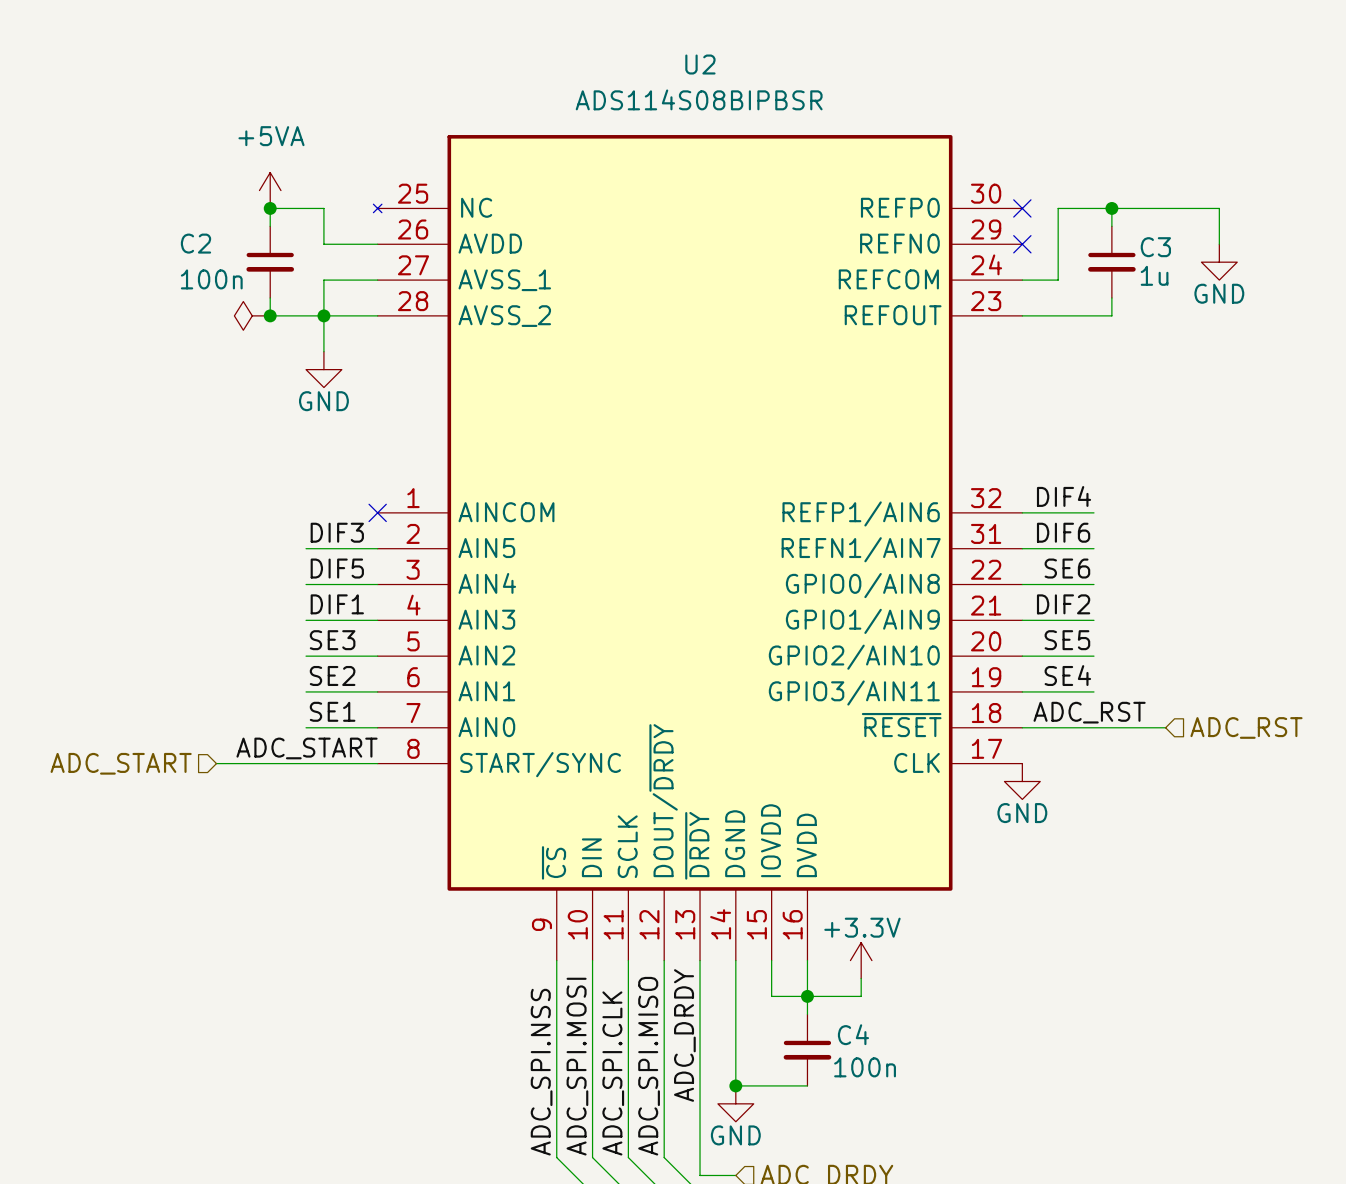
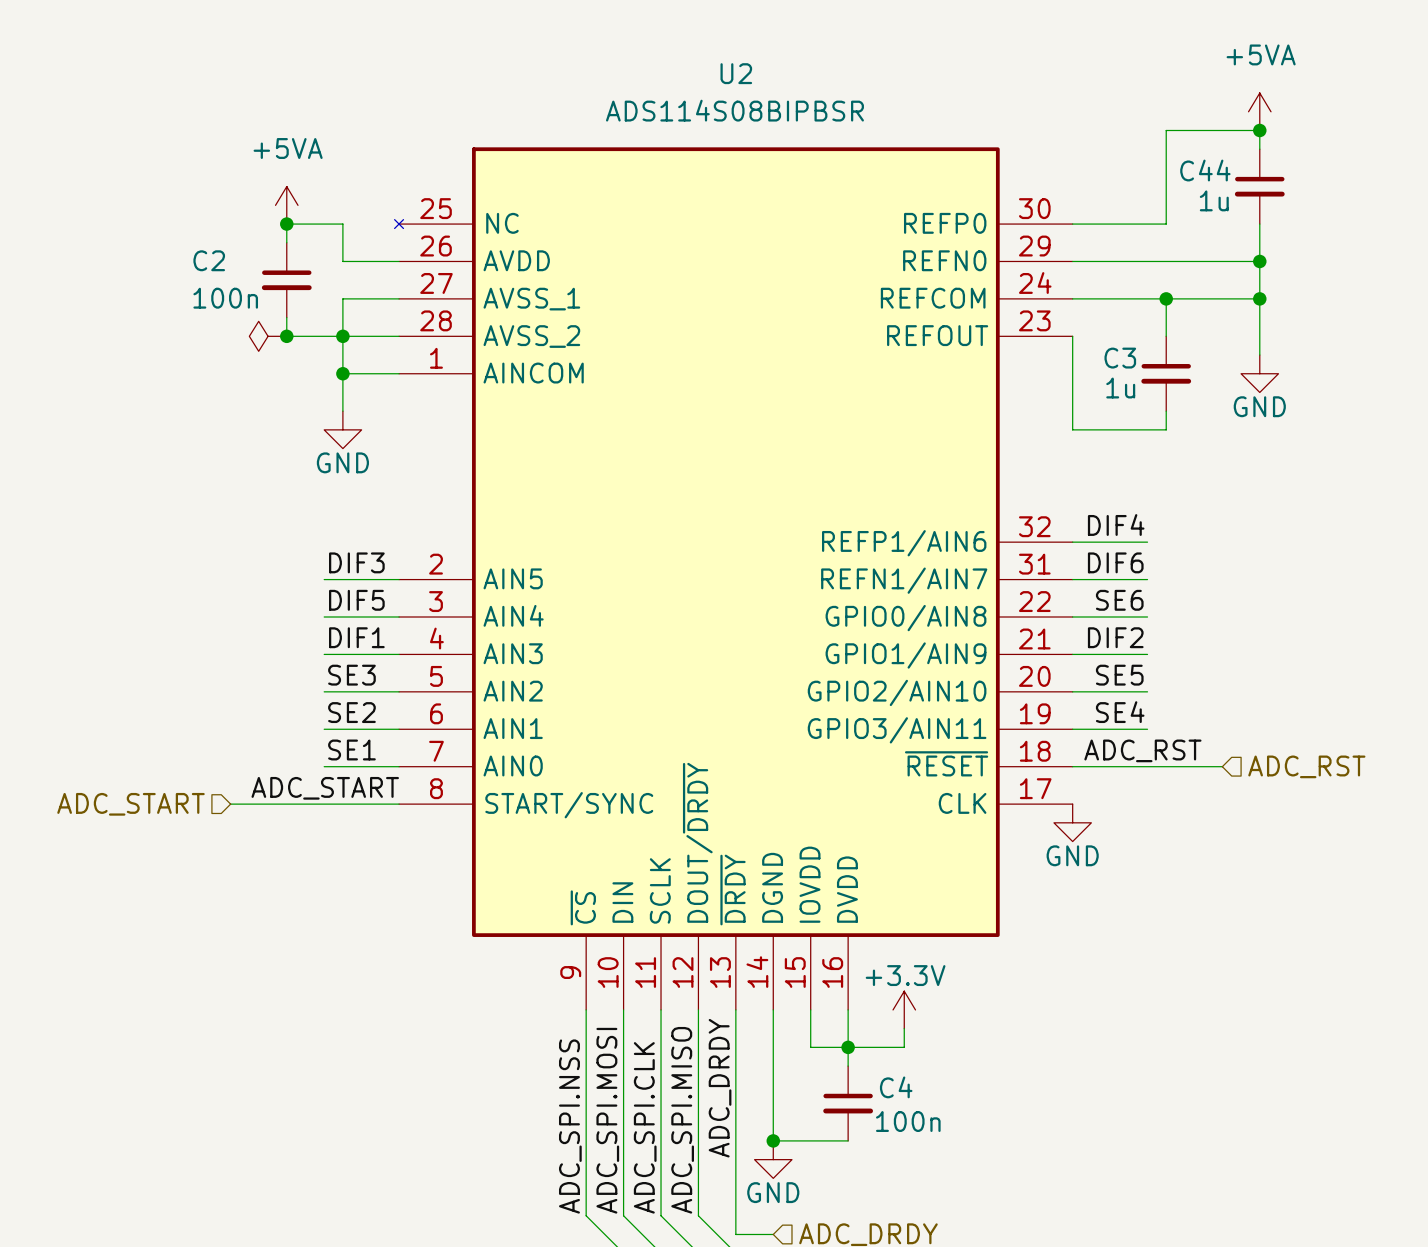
power symbol: none -> +5VA (1259, 111)
junction: none -> (1259, 130)
U2 symbol: [373, 135, 1023, 961] -> [394, 147, 1073, 1010]
wire: none -> (1259, 149) (1259, 130) (1166, 130) (1166, 224)
C44: none -> 1u (1259, 186)
no-connect mark: (1022, 208) -> none
wire: (1058, 208) (1058, 280) -> (1110, 224) (1072, 224)
junction: (1111, 208) -> none
wire: none -> (1259, 224) (1259, 355)
wire: (1111, 226) (1111, 208) (1219, 208) (1219, 244) -> none
wire: none -> (1072, 261) (1259, 261)
no-connect mark: (1022, 244) -> none
junction: none -> (1259, 261)
C3 name position: C3 (1155, 247) -> C3 (1120, 358)
C3 position: (1111, 262) -> (1166, 373)
power symbol position: GND (1219, 262) -> GND (1259, 373)
C3 value position: 1u (1154, 275) -> 1u (1120, 388)
wire: none -> (1110, 298) (1259, 298)
junction: none -> (1166, 298)
junction: none -> (1259, 298)
wire: (1022, 315) (1111, 315) -> (1072, 336) (1072, 429) (1166, 429) (1166, 411)
junction: none -> (342, 373)
wire: none -> (399, 373) (342, 373) (342, 411)
power symbol position: GND (323, 369) -> GND (342, 429)
no-connect mark: (377, 512) -> none

